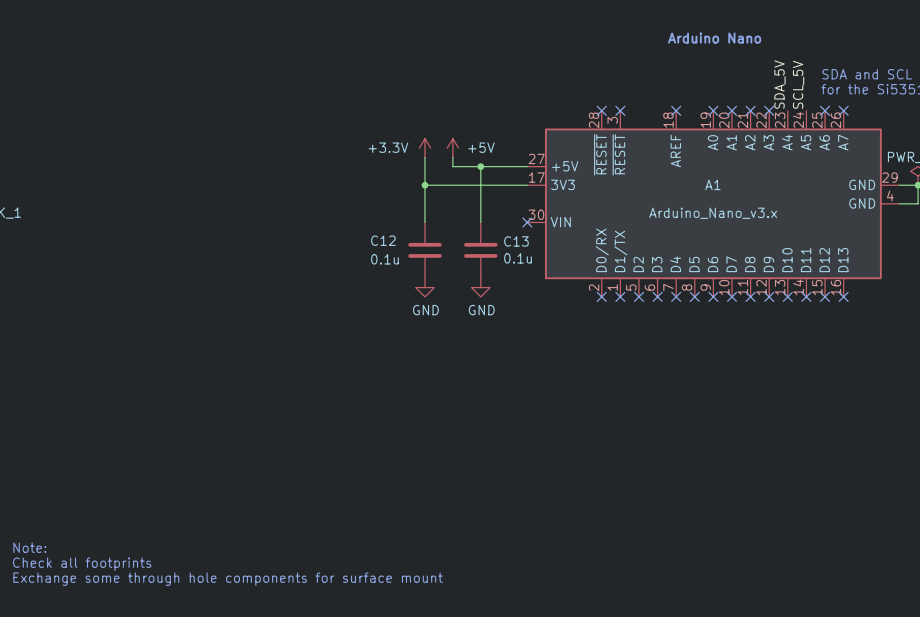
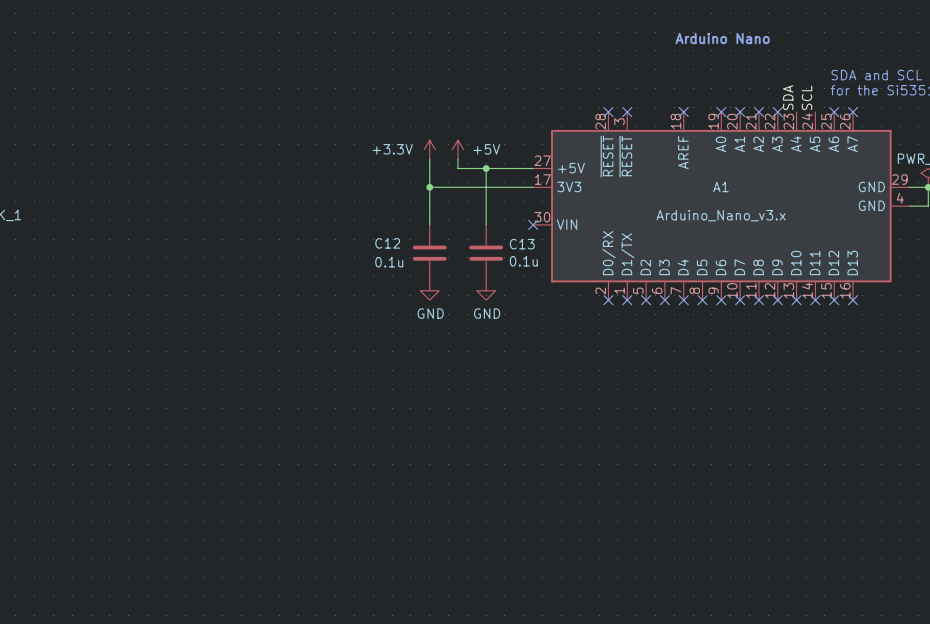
label: SDA_5V (779, 84) -> SDA (788, 97)
label: SCL_5V (798, 84) -> SCL (807, 97)
text: Note: (29, 547) -> none
text: Check all footprints (82, 564) -> none
text: Exchange some through hole components for surface mount (228, 579) -> none

